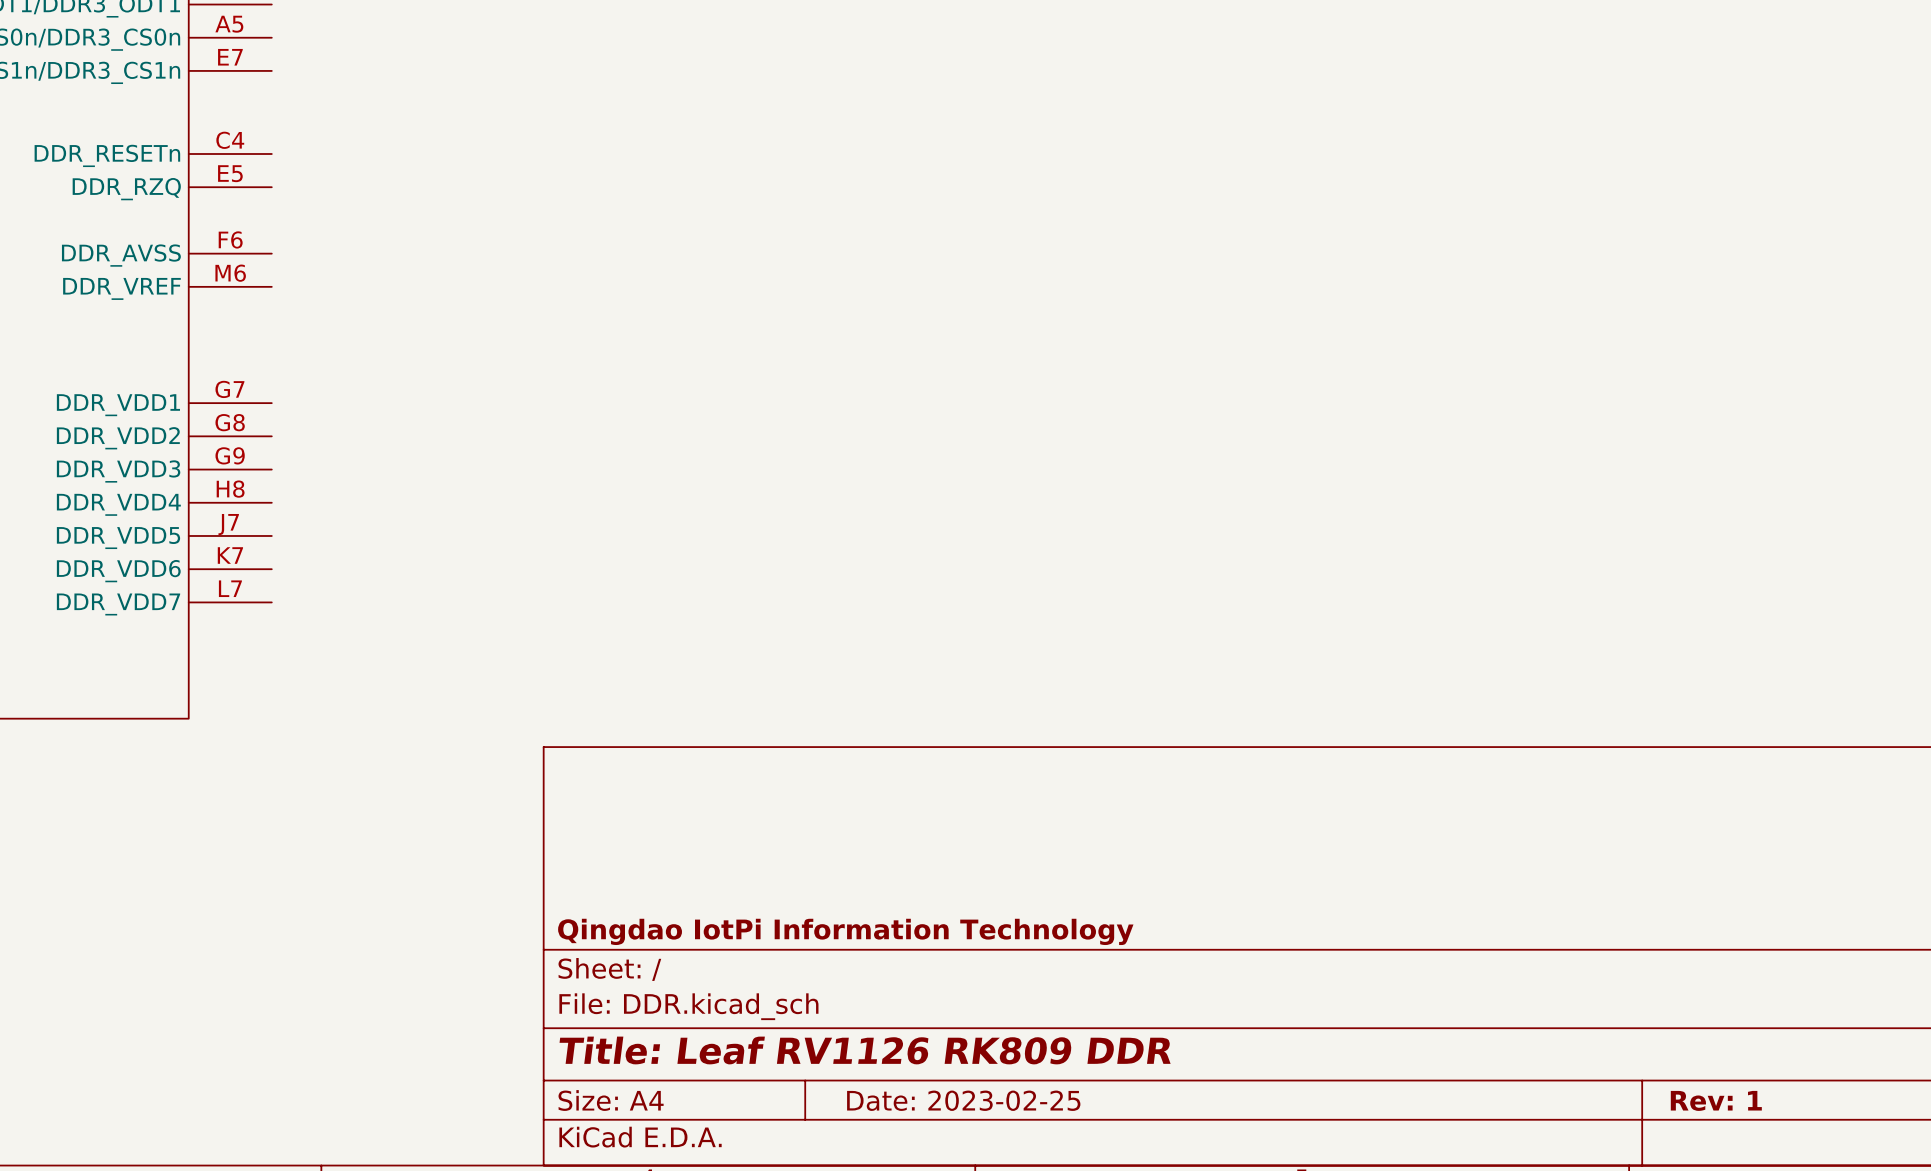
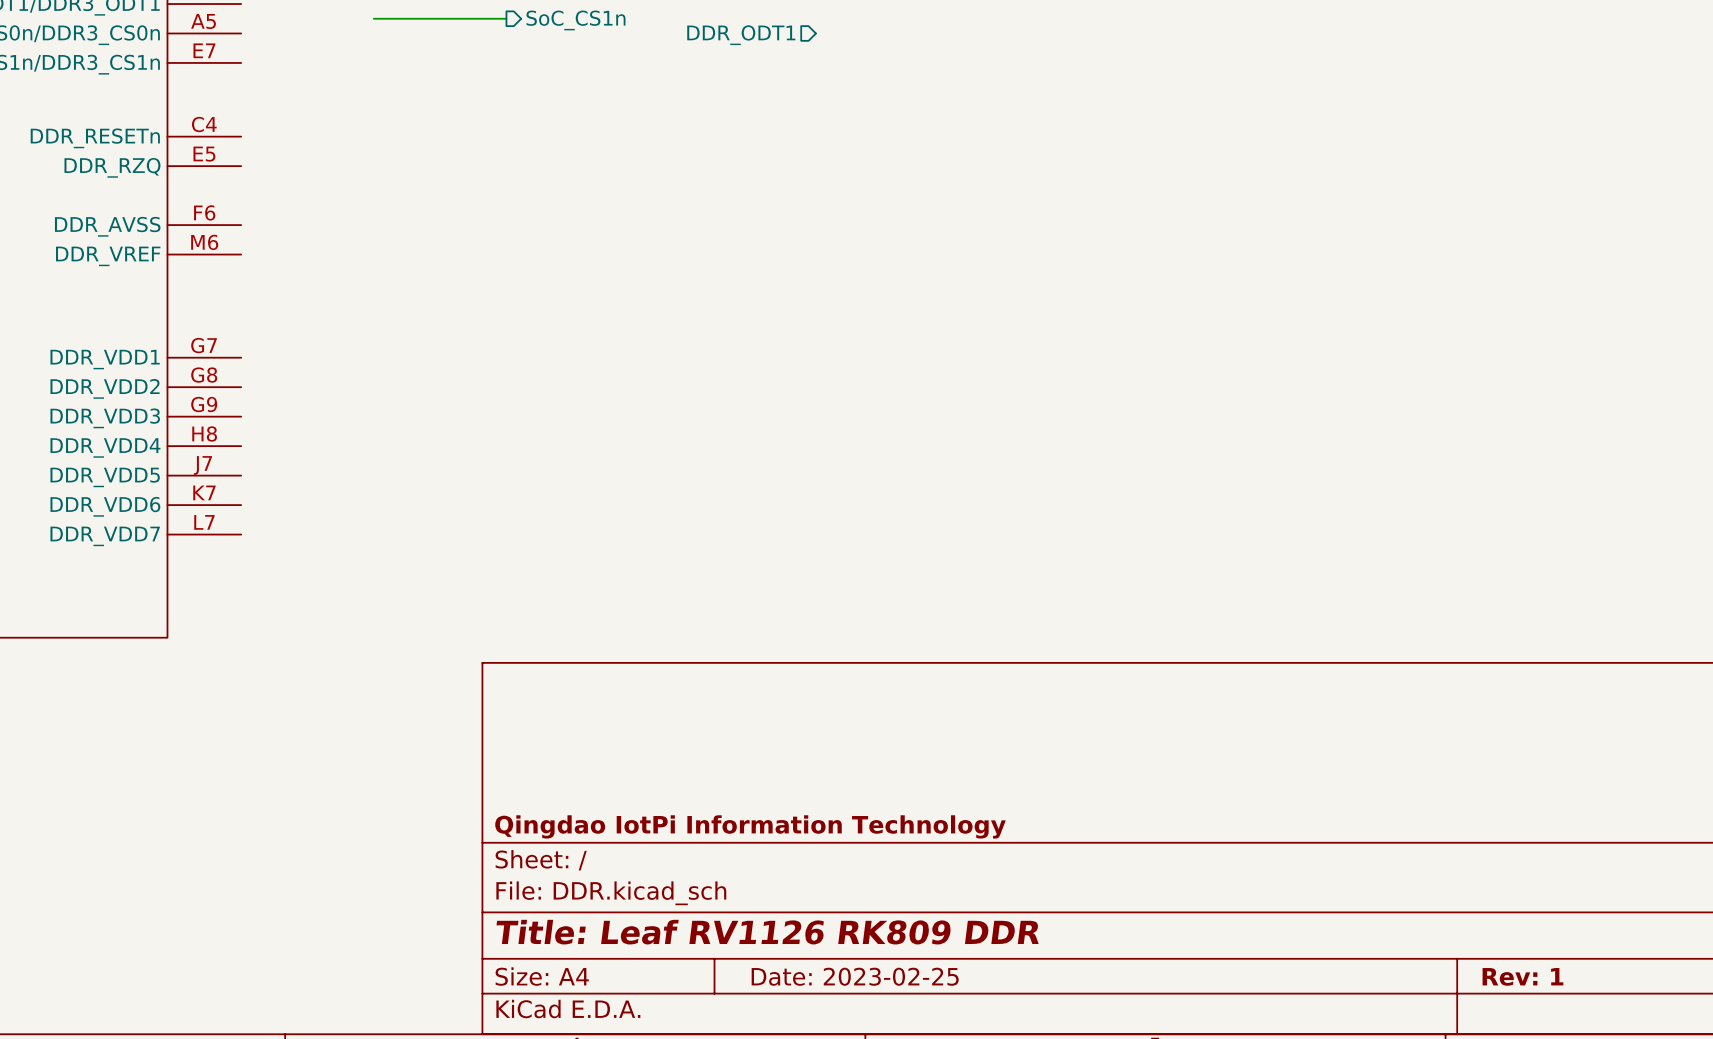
wire: none -> (373, 18) (506, 18)
sheet pin: none -> SoC_CS1n (575, 20)
sheet pin: none -> DDR_ODT1 (741, 35)

